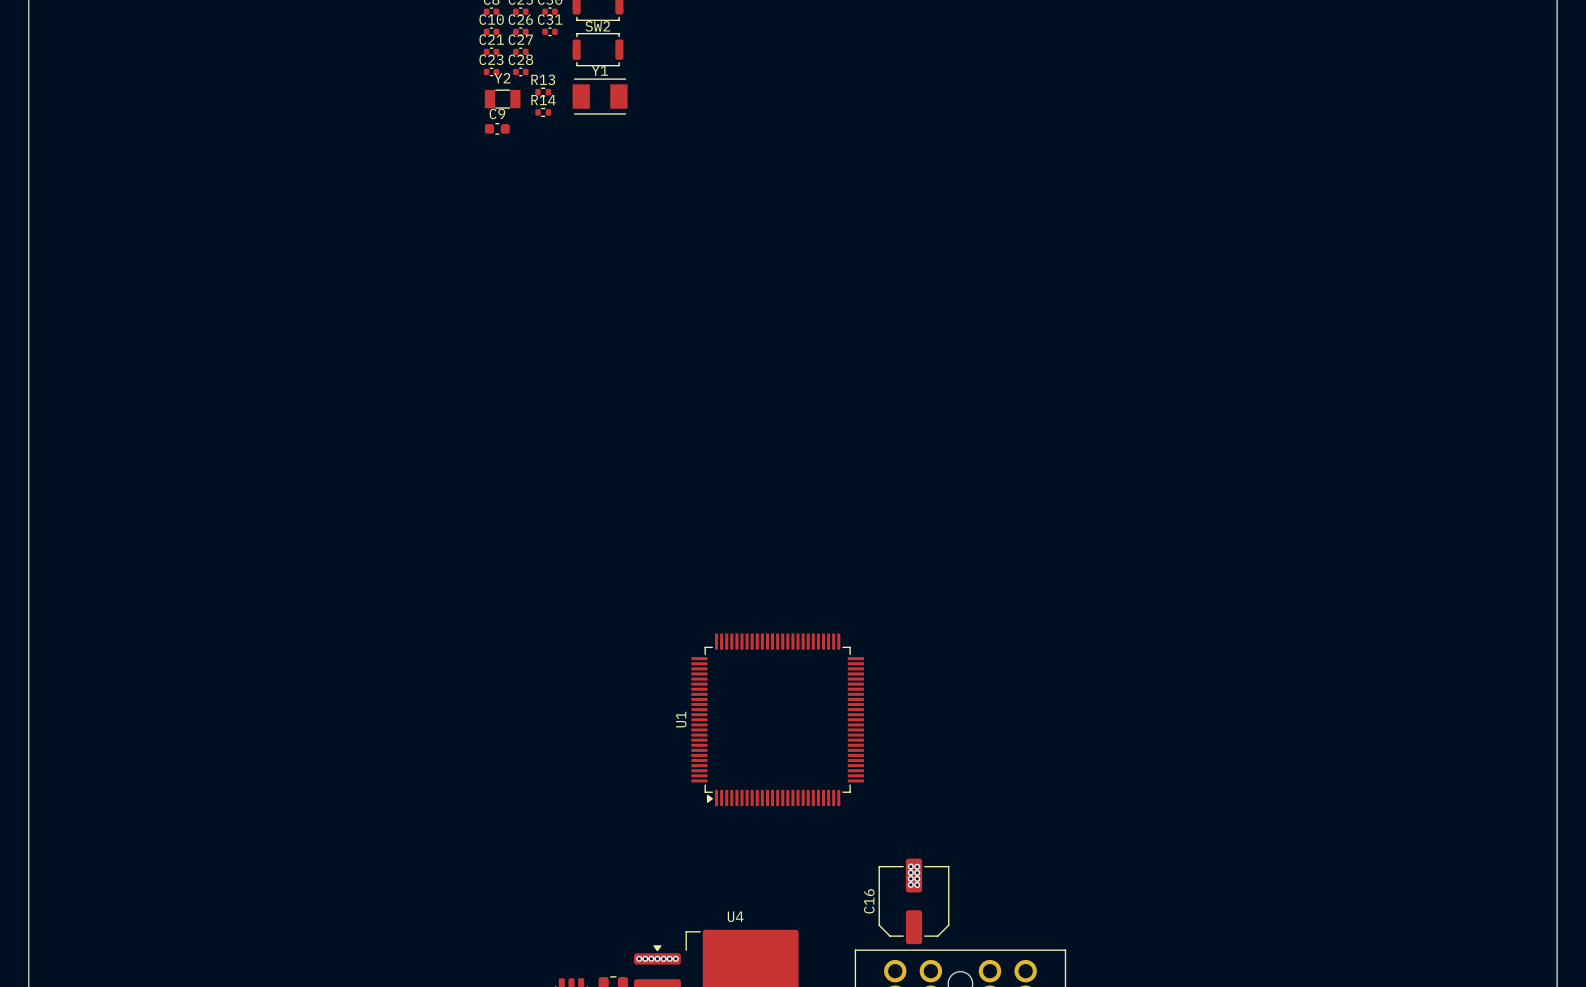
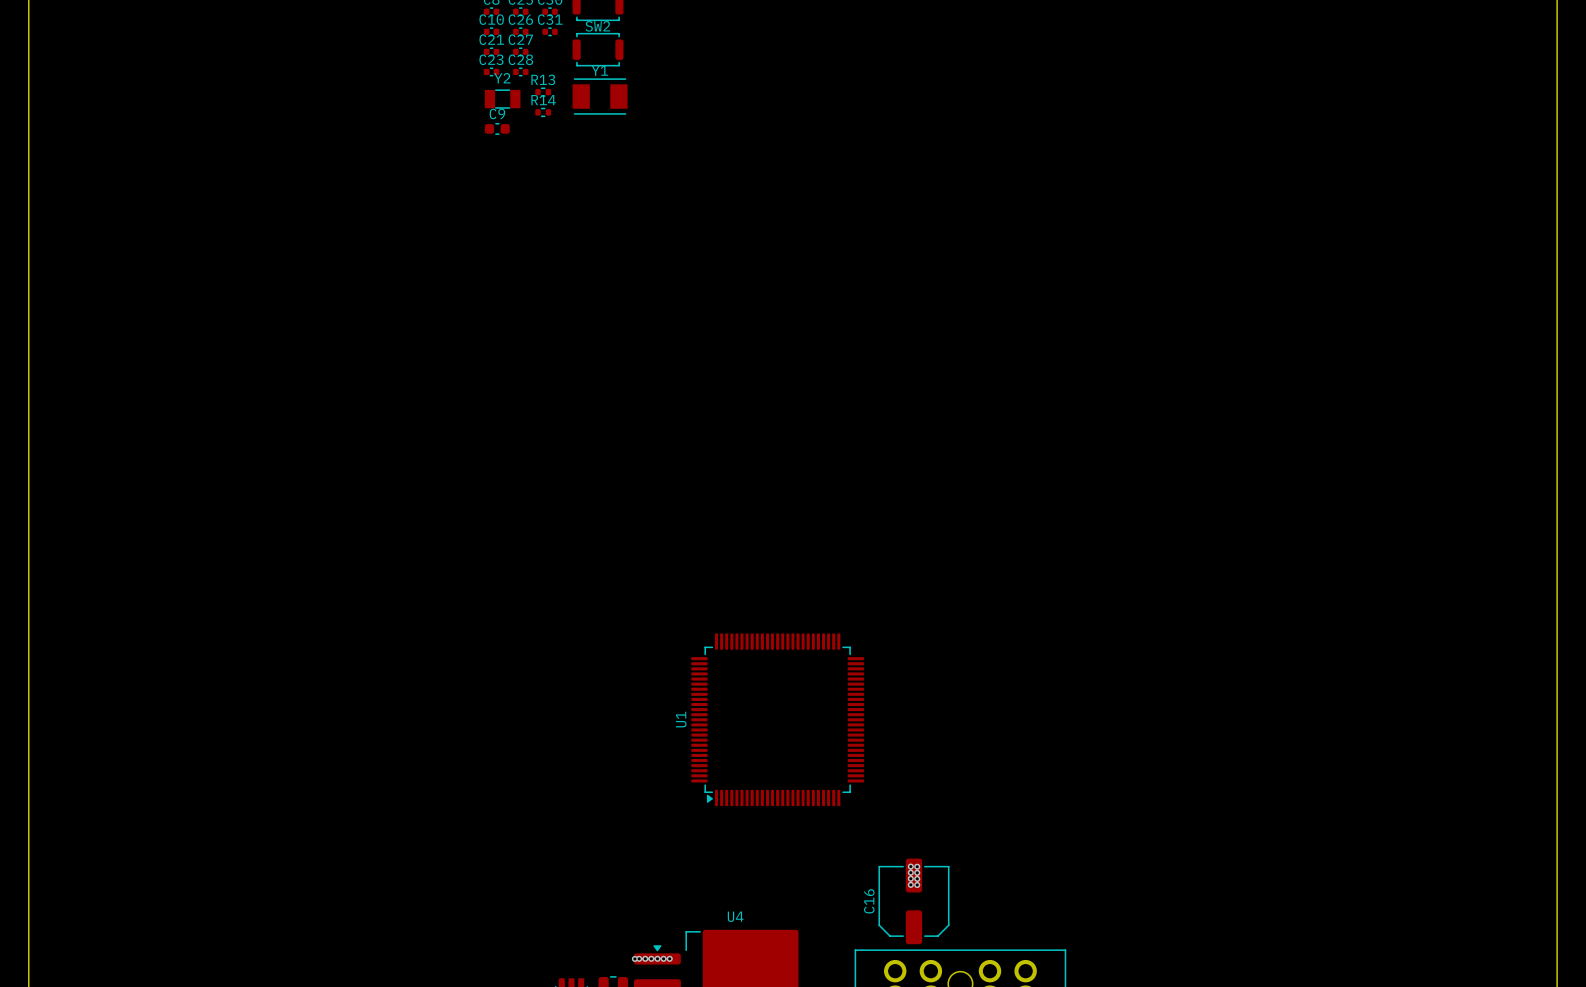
via: none -> (634, 958)
via: (675, 958) -> none

